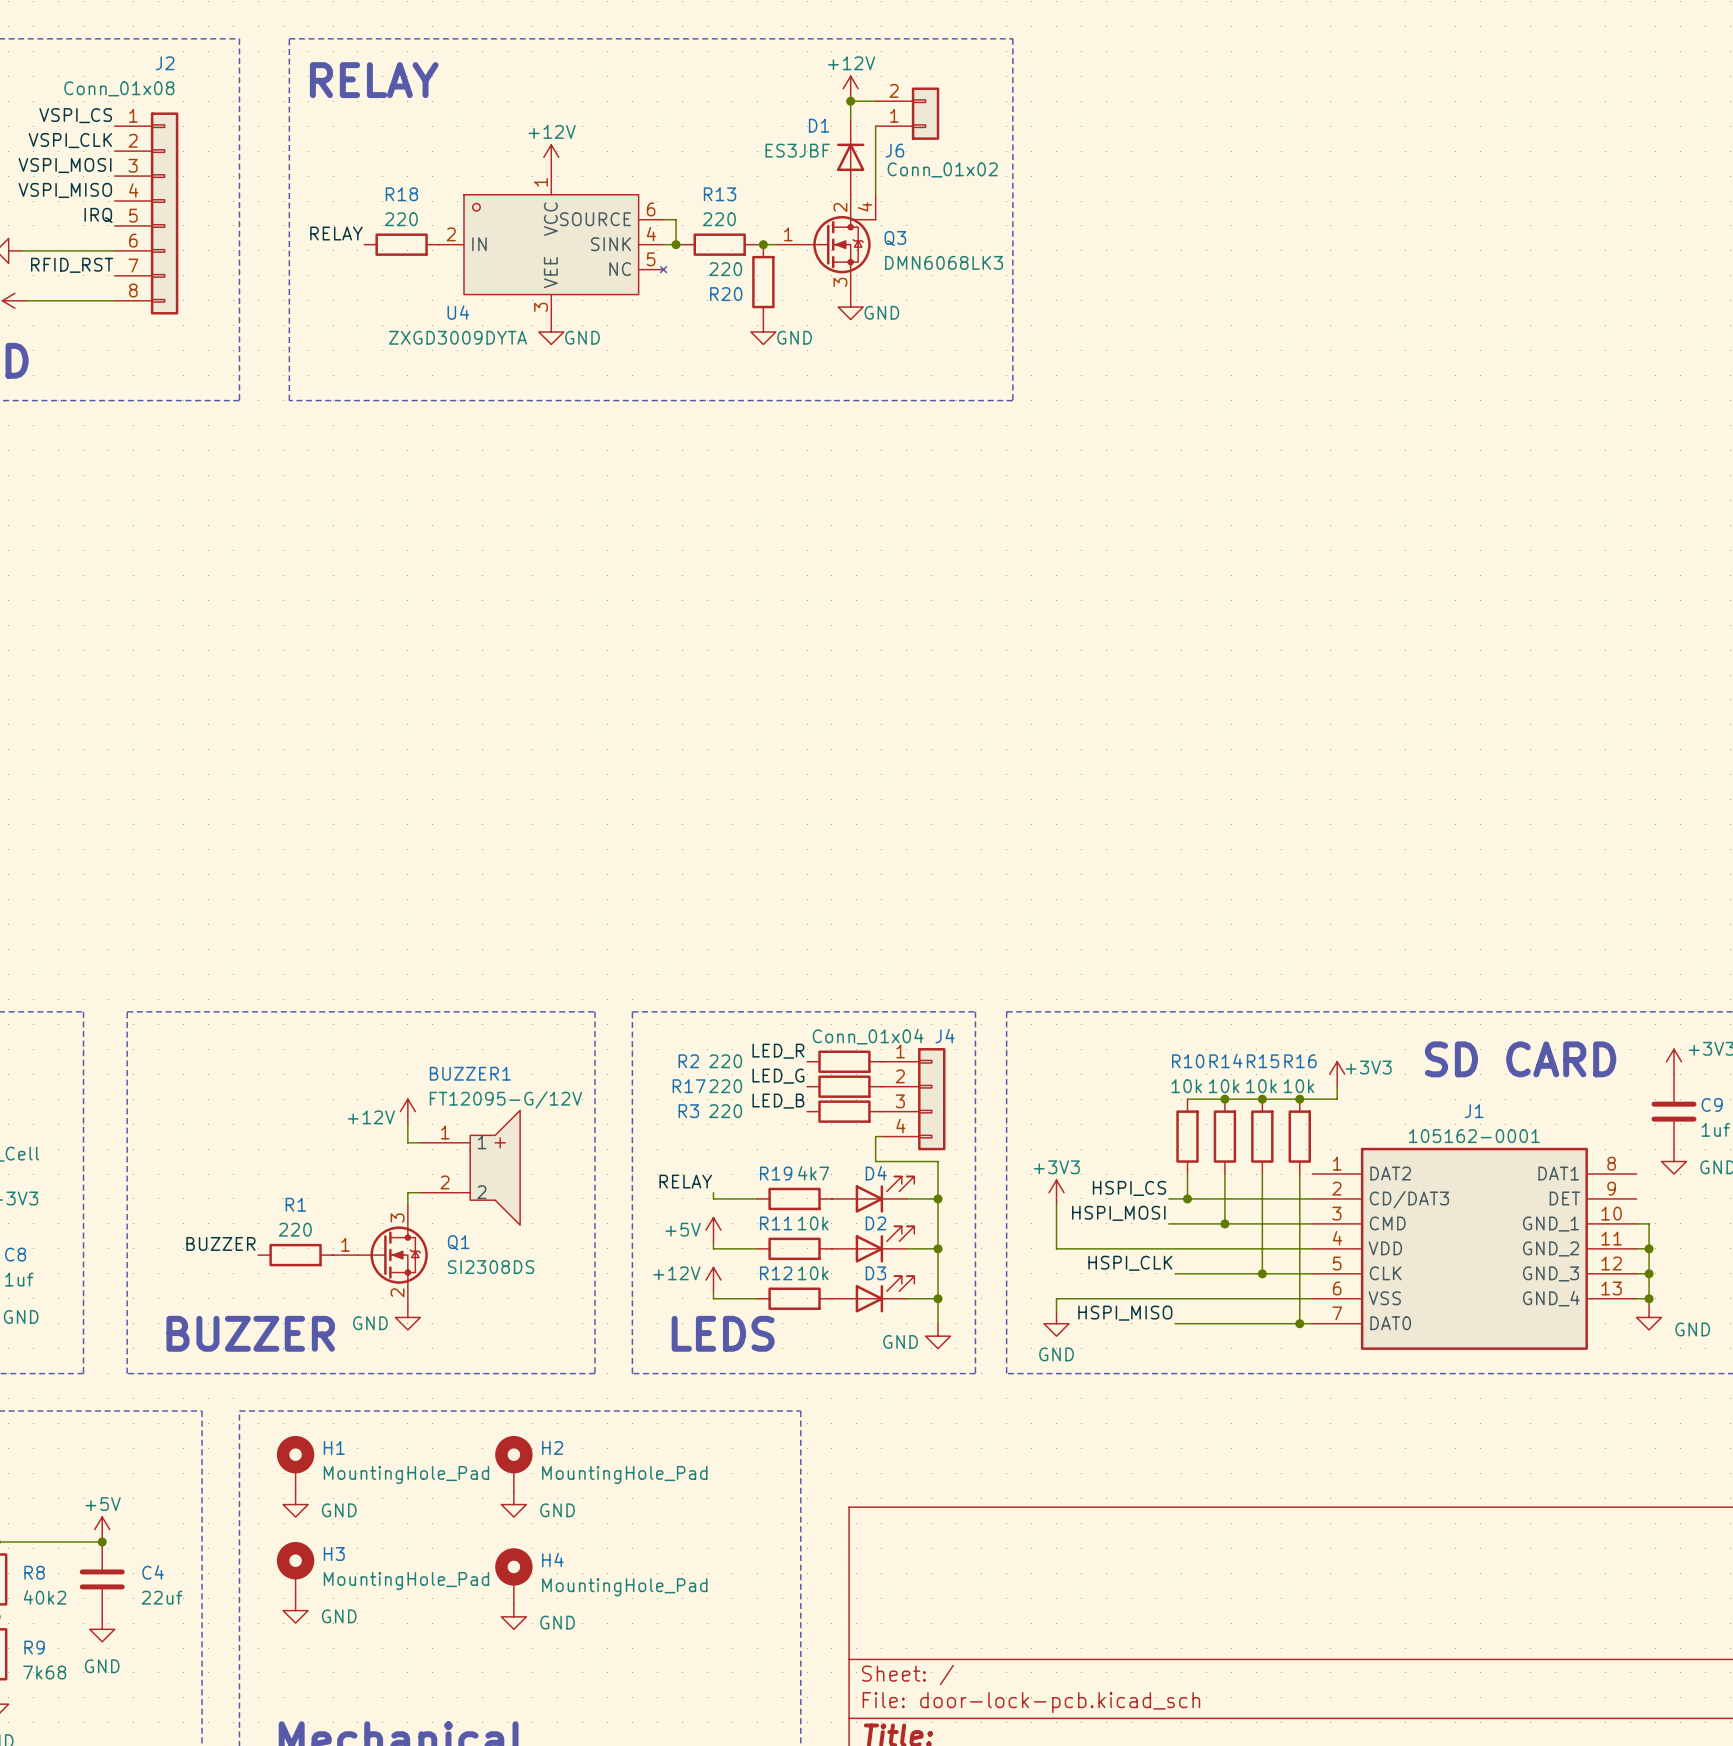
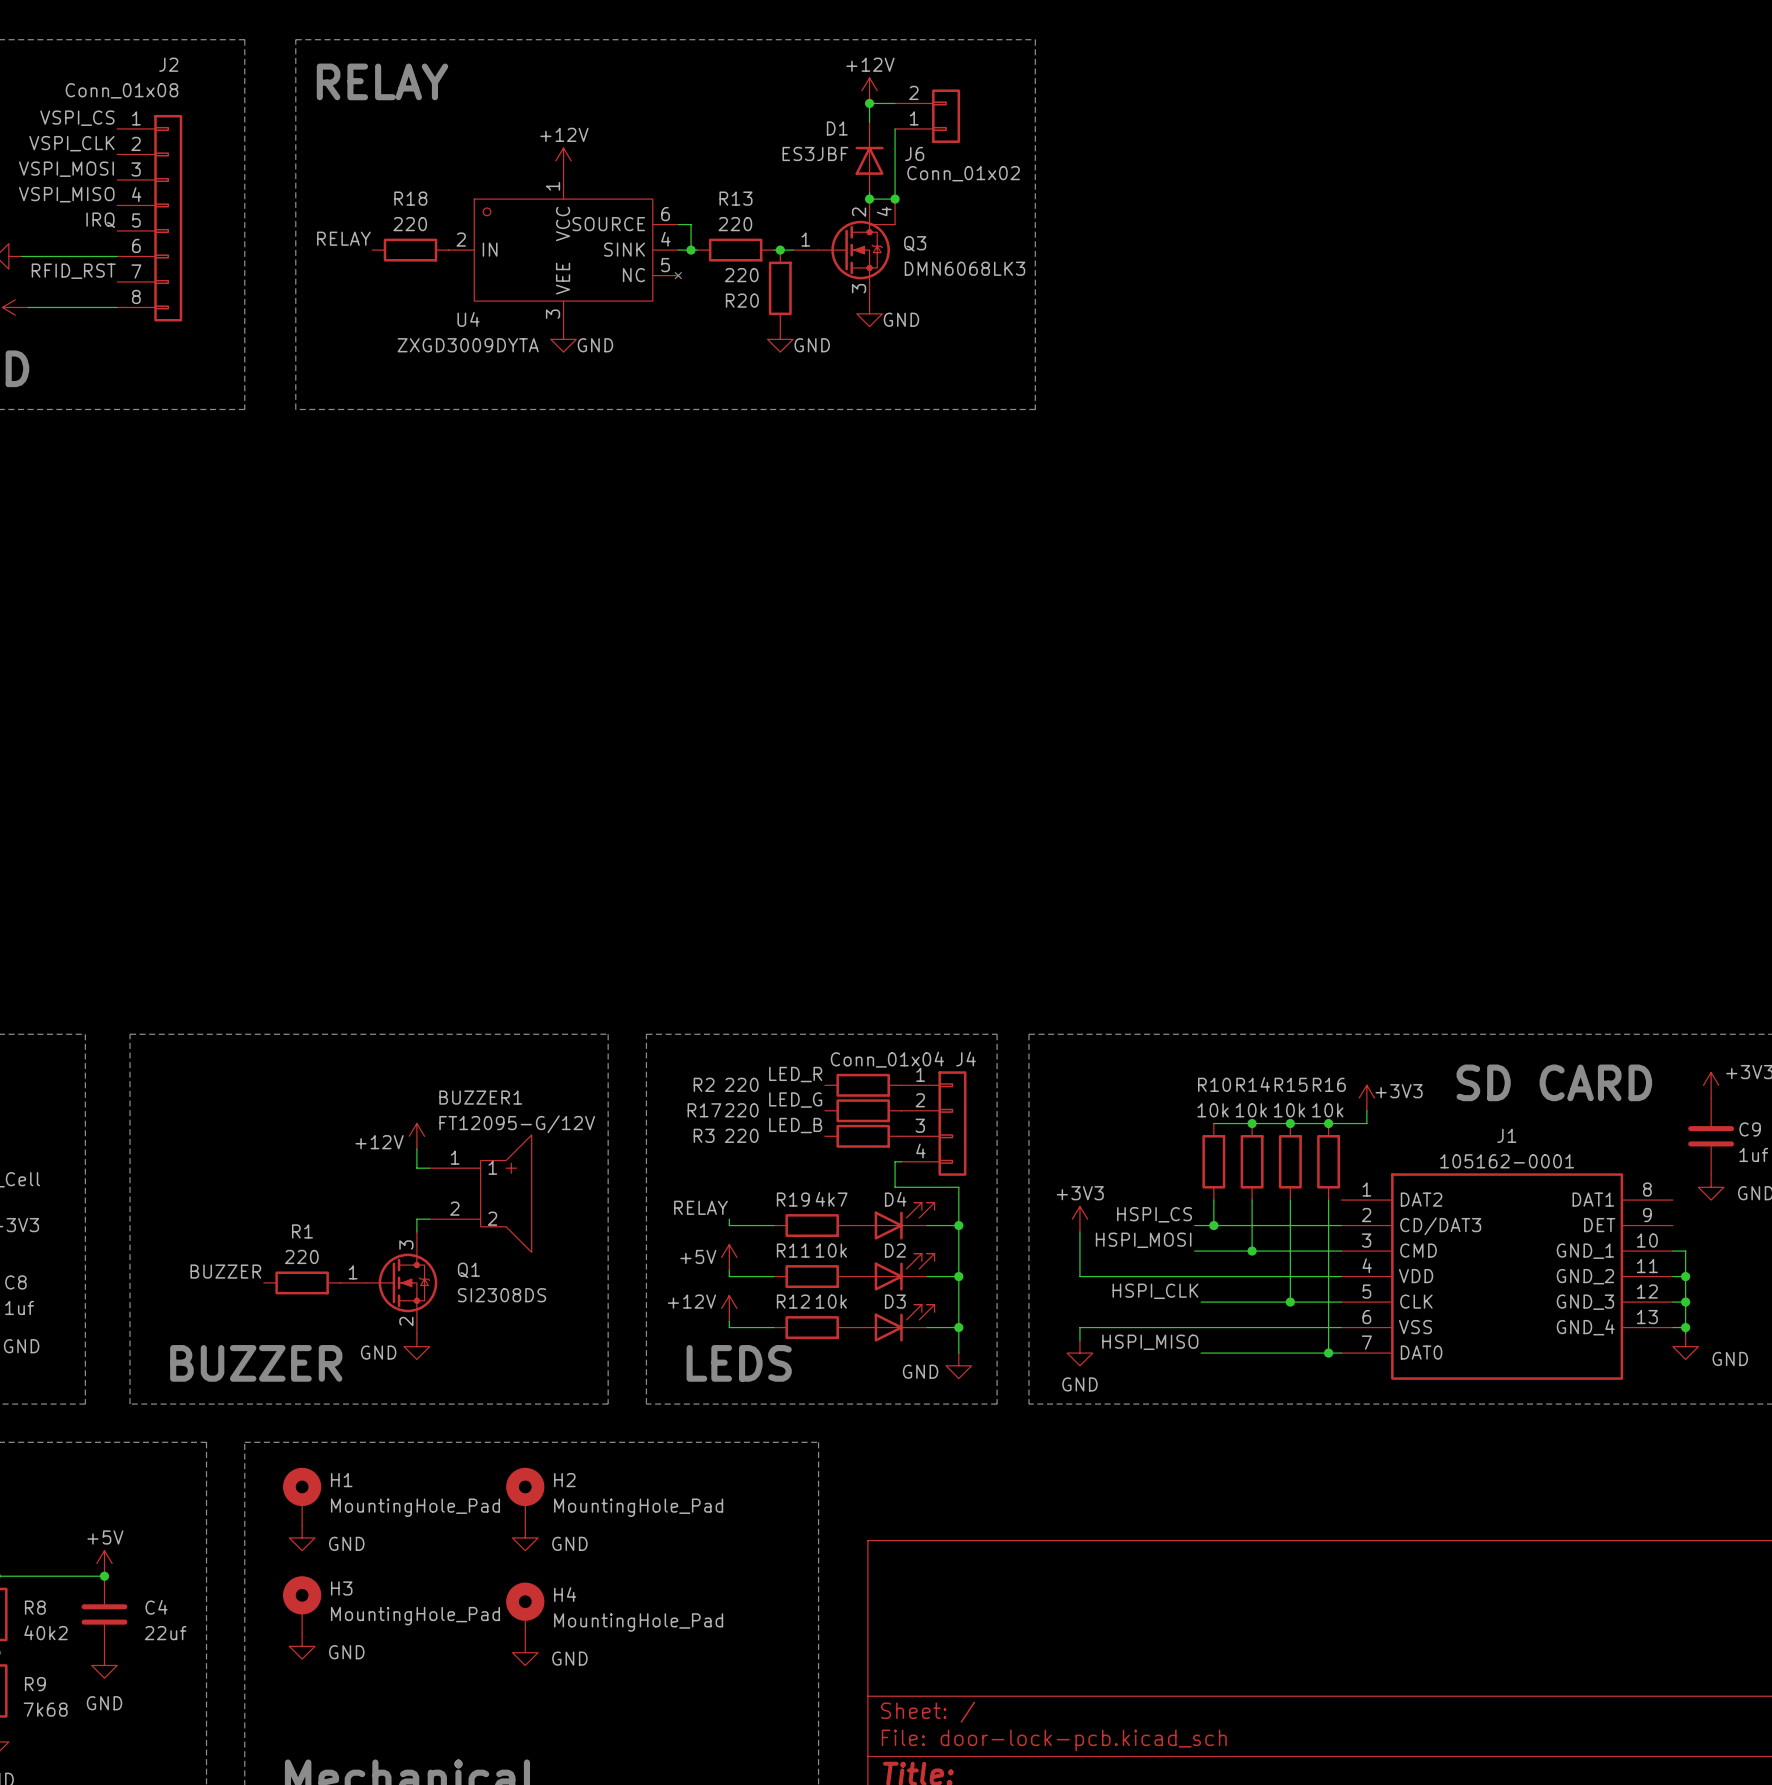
wire: none -> (869, 192) (869, 199) (895, 199)
junction: none -> (869, 199)
junction: none -> (895, 199)

